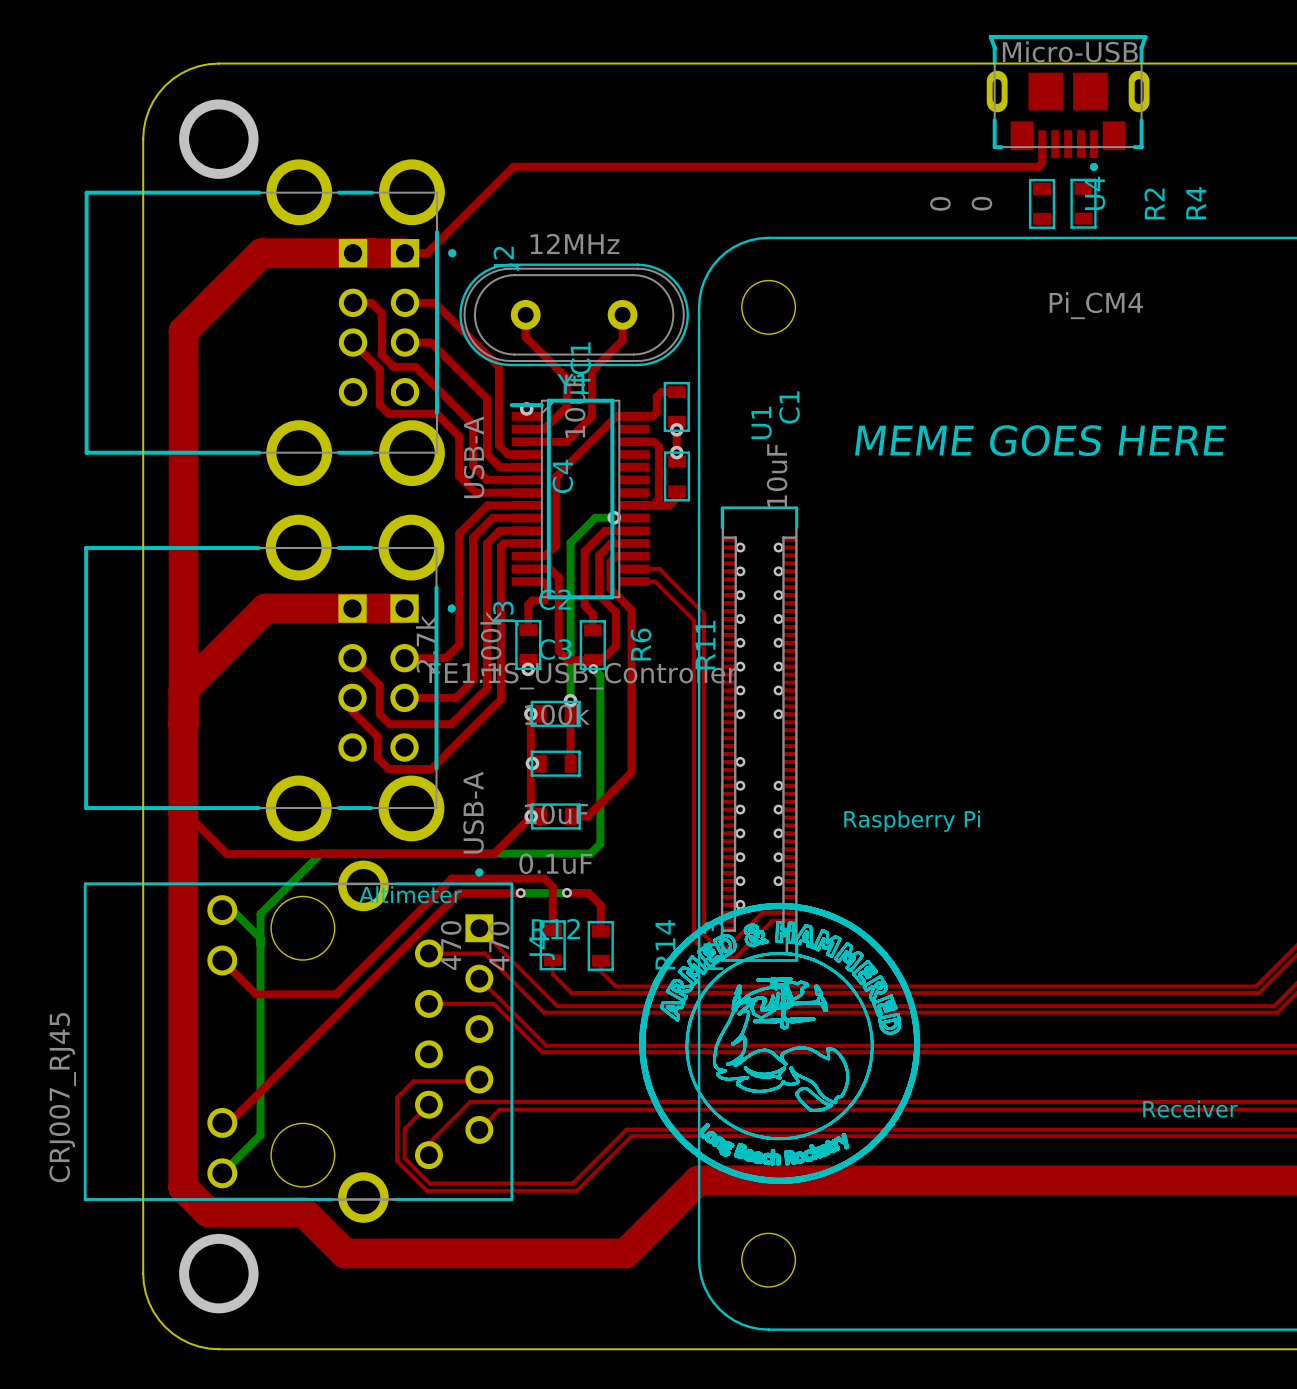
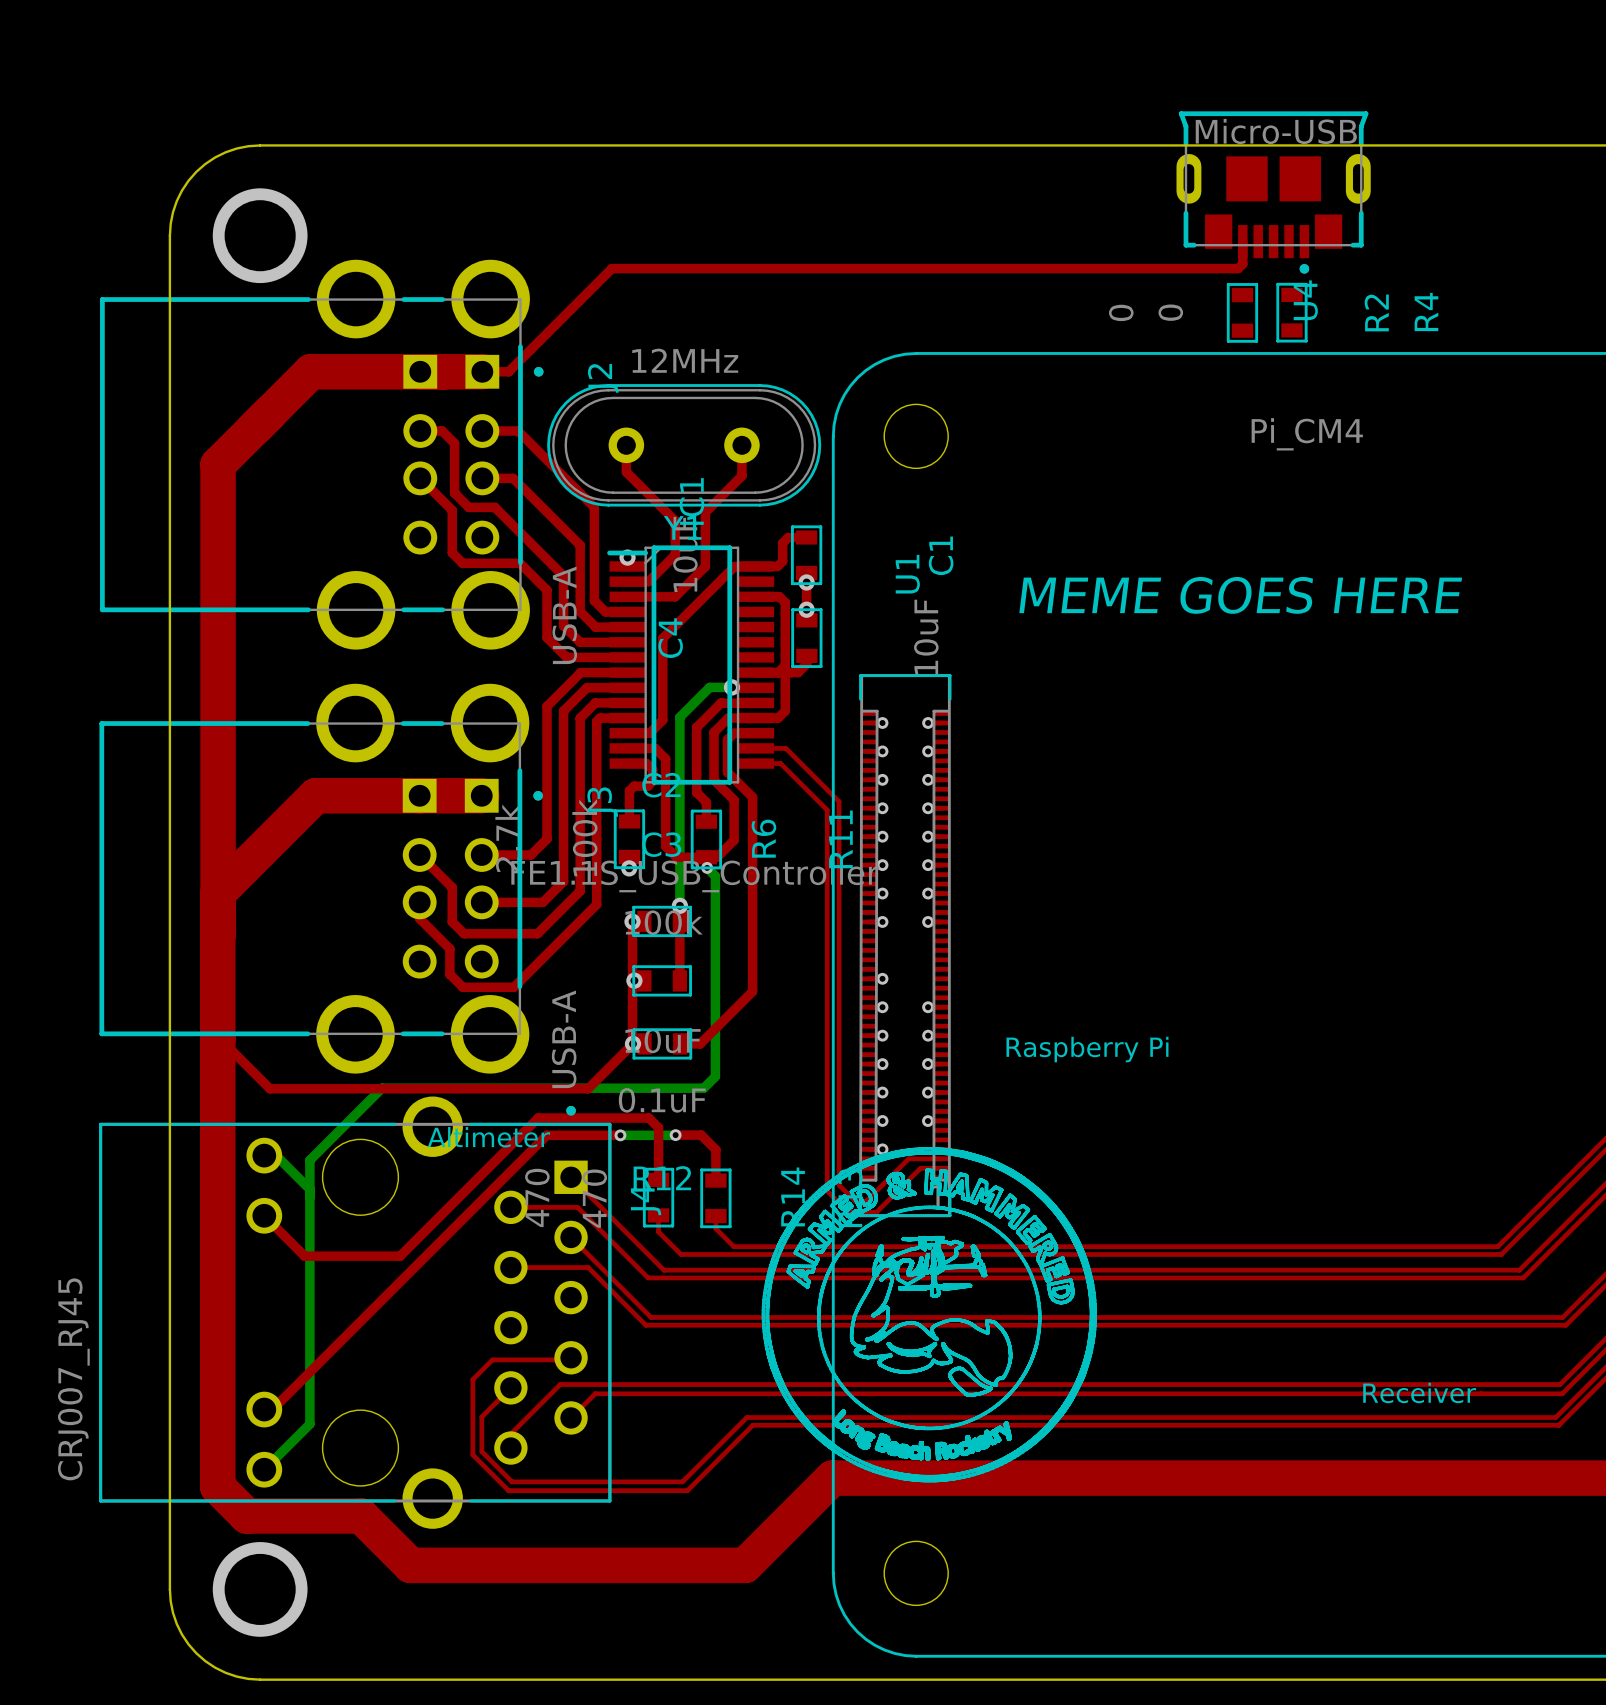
top track: none -> (785, 665) (785, 710) (778, 718) (756, 718)

